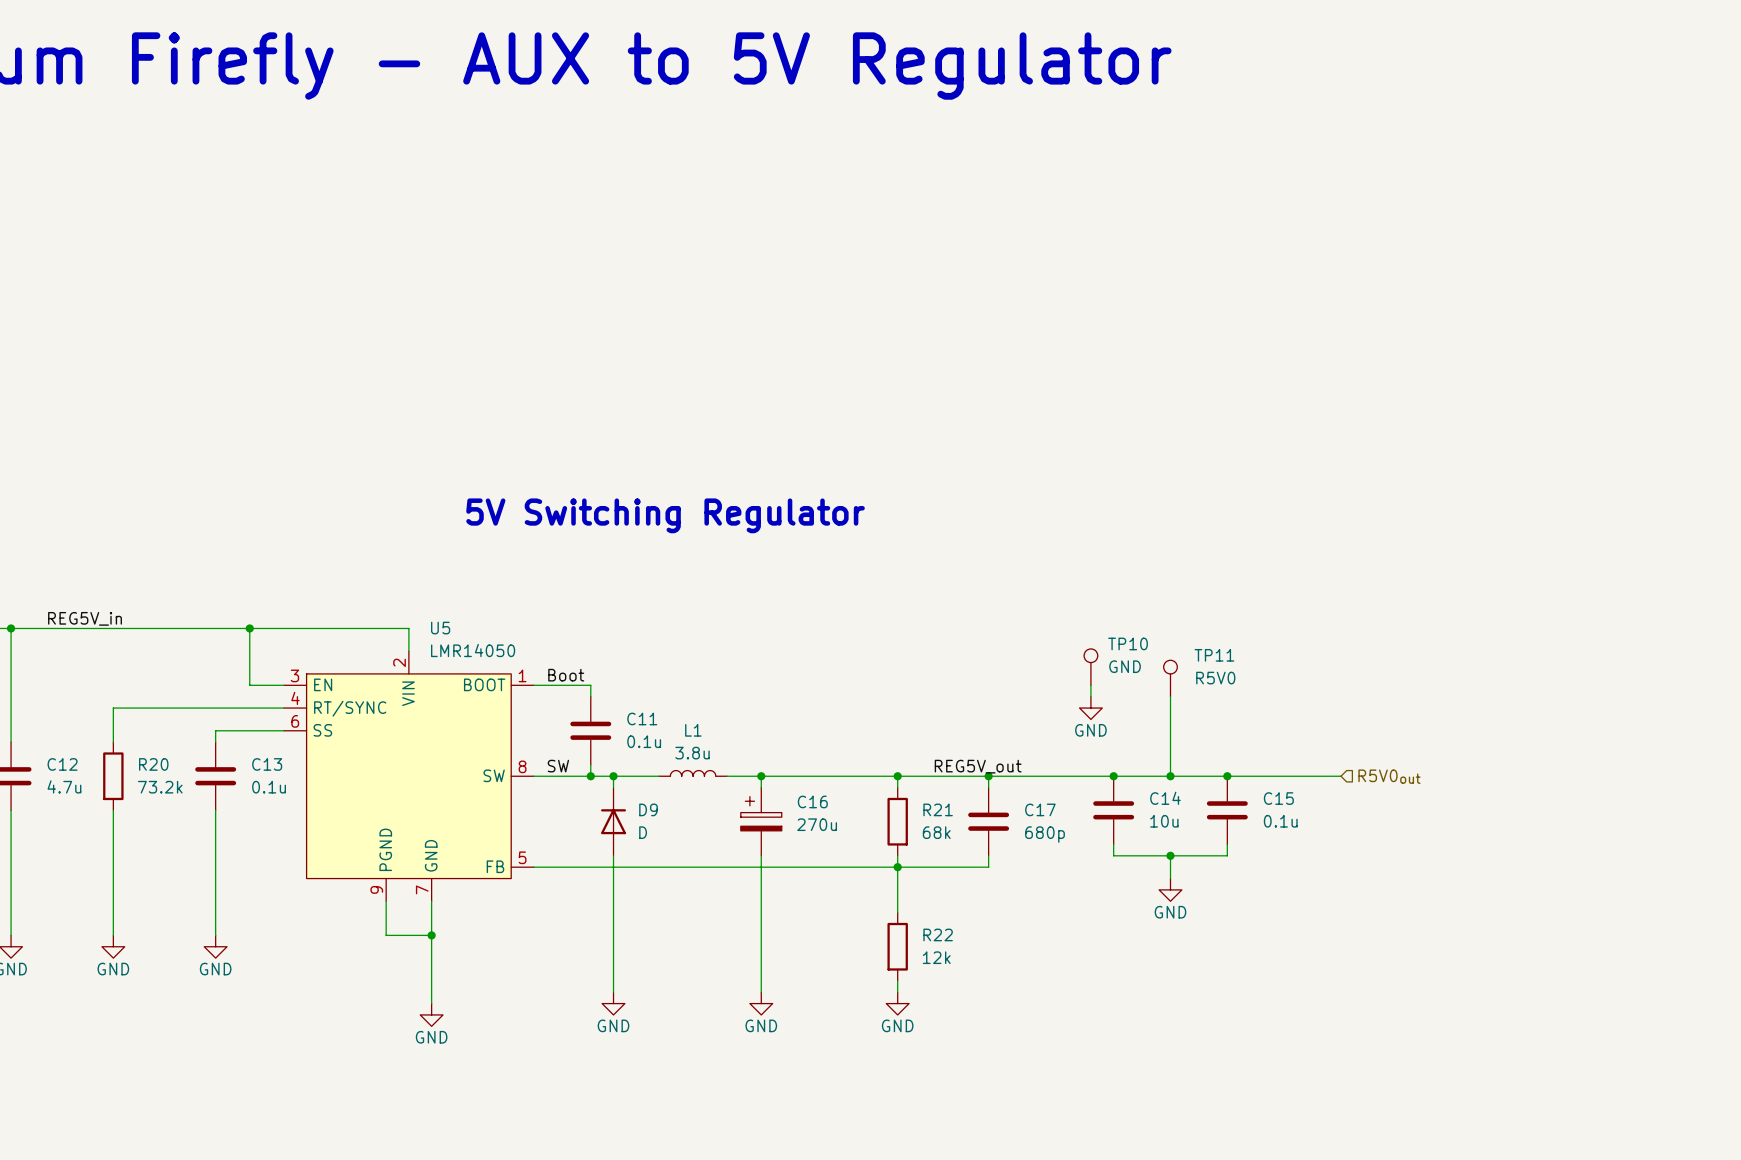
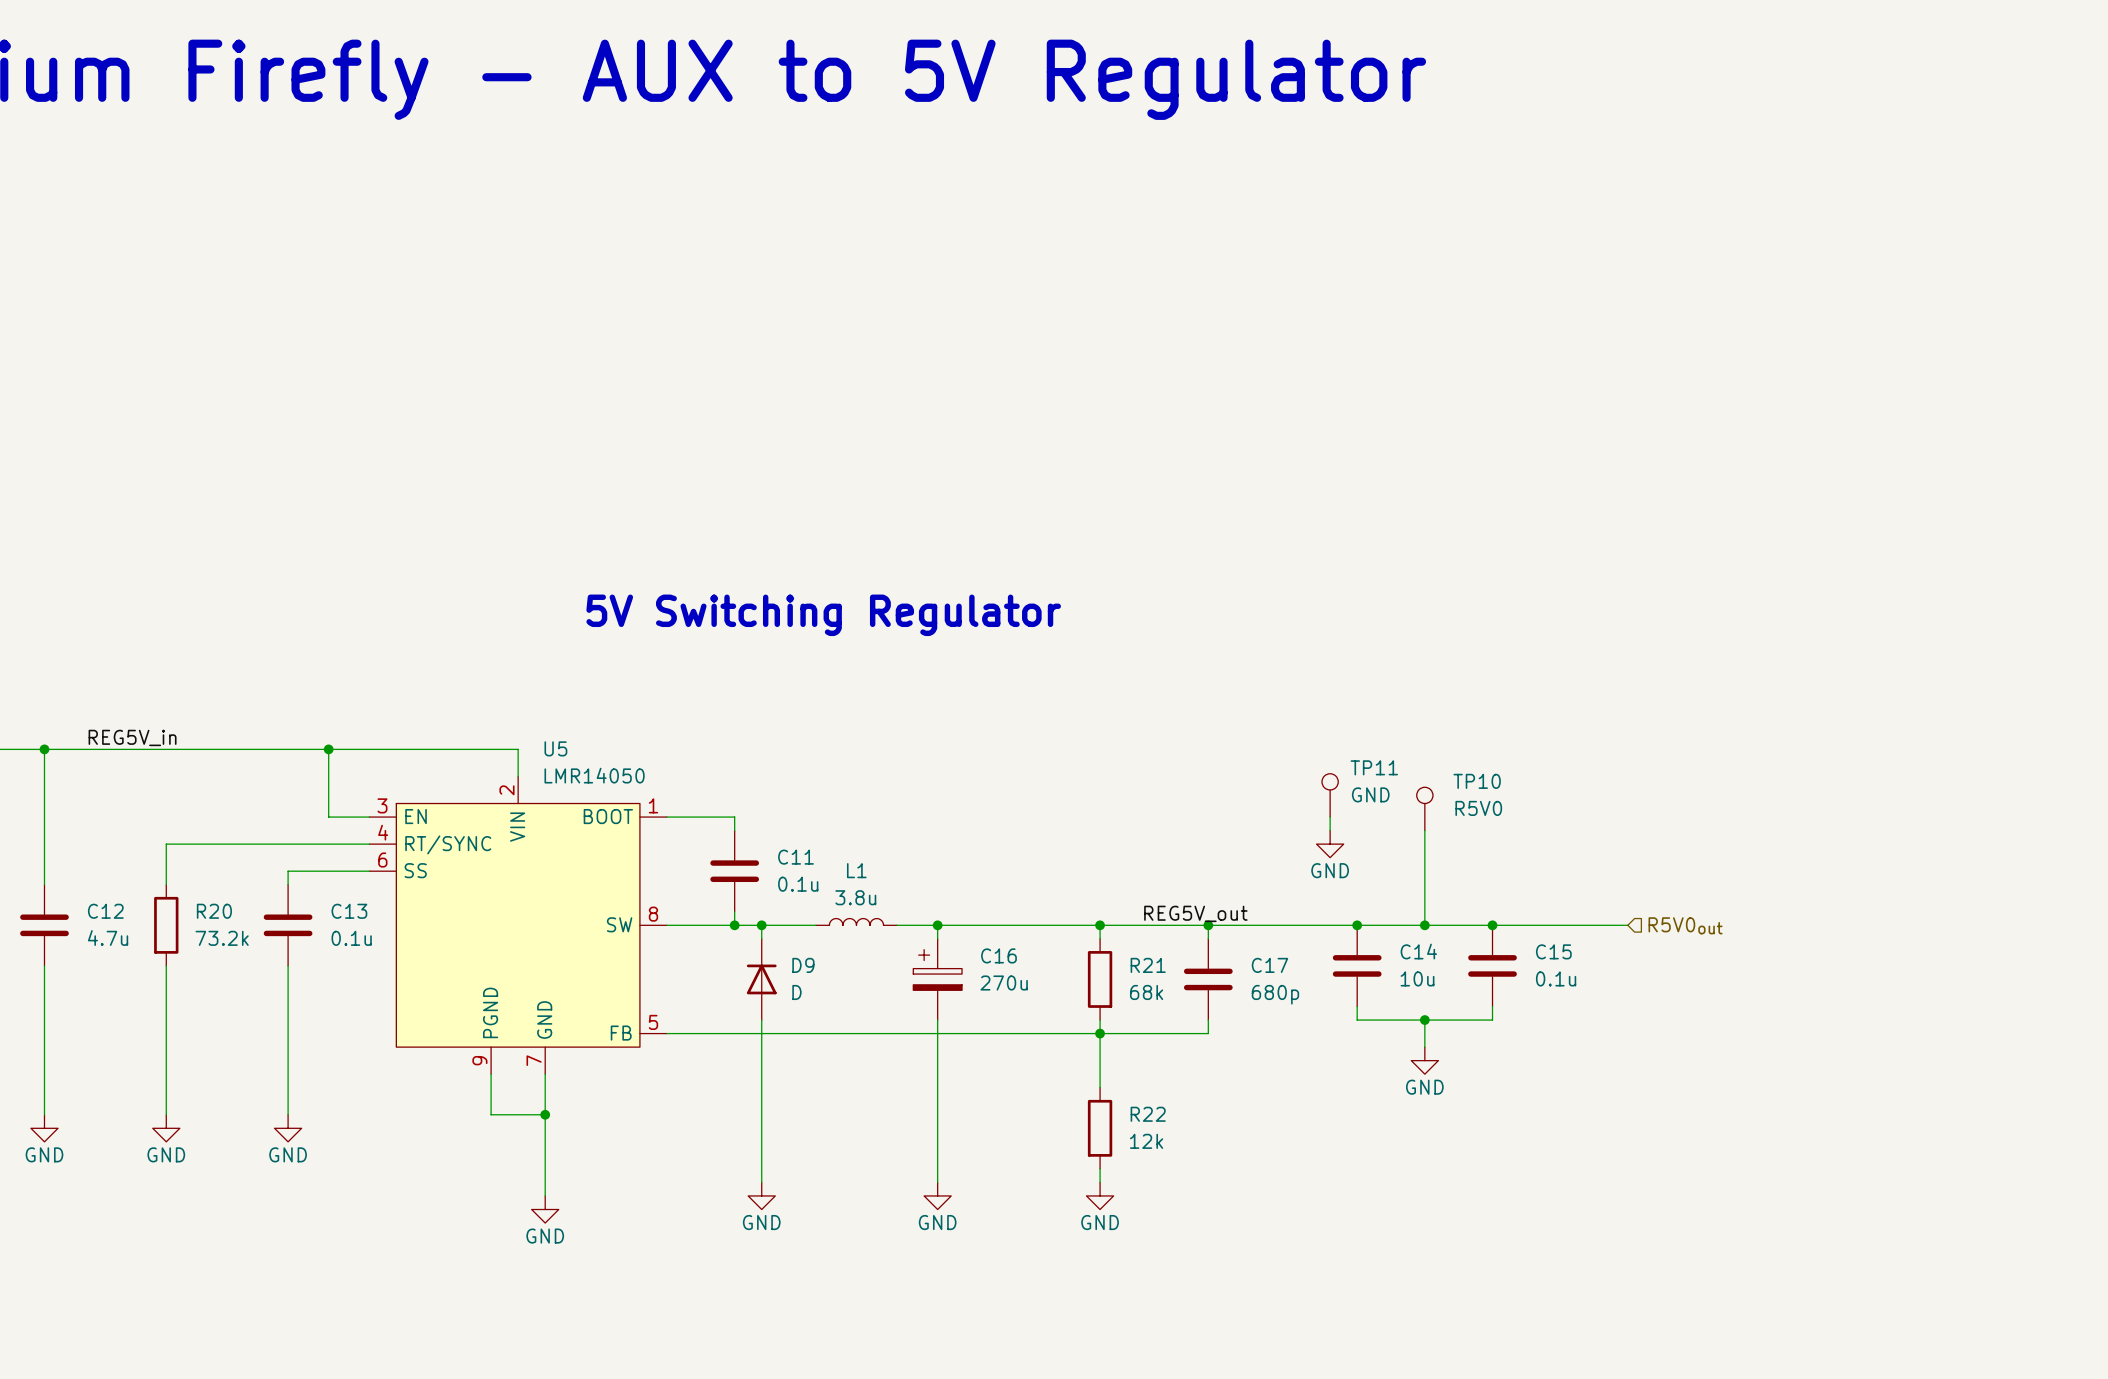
TP10 name: TP10 (1128, 643) -> TP11 (1374, 767)
TP11 name: TP11 (1214, 655) -> TP10 (1477, 781)
label: Boot (566, 675) -> none
label: SW (558, 766) -> none

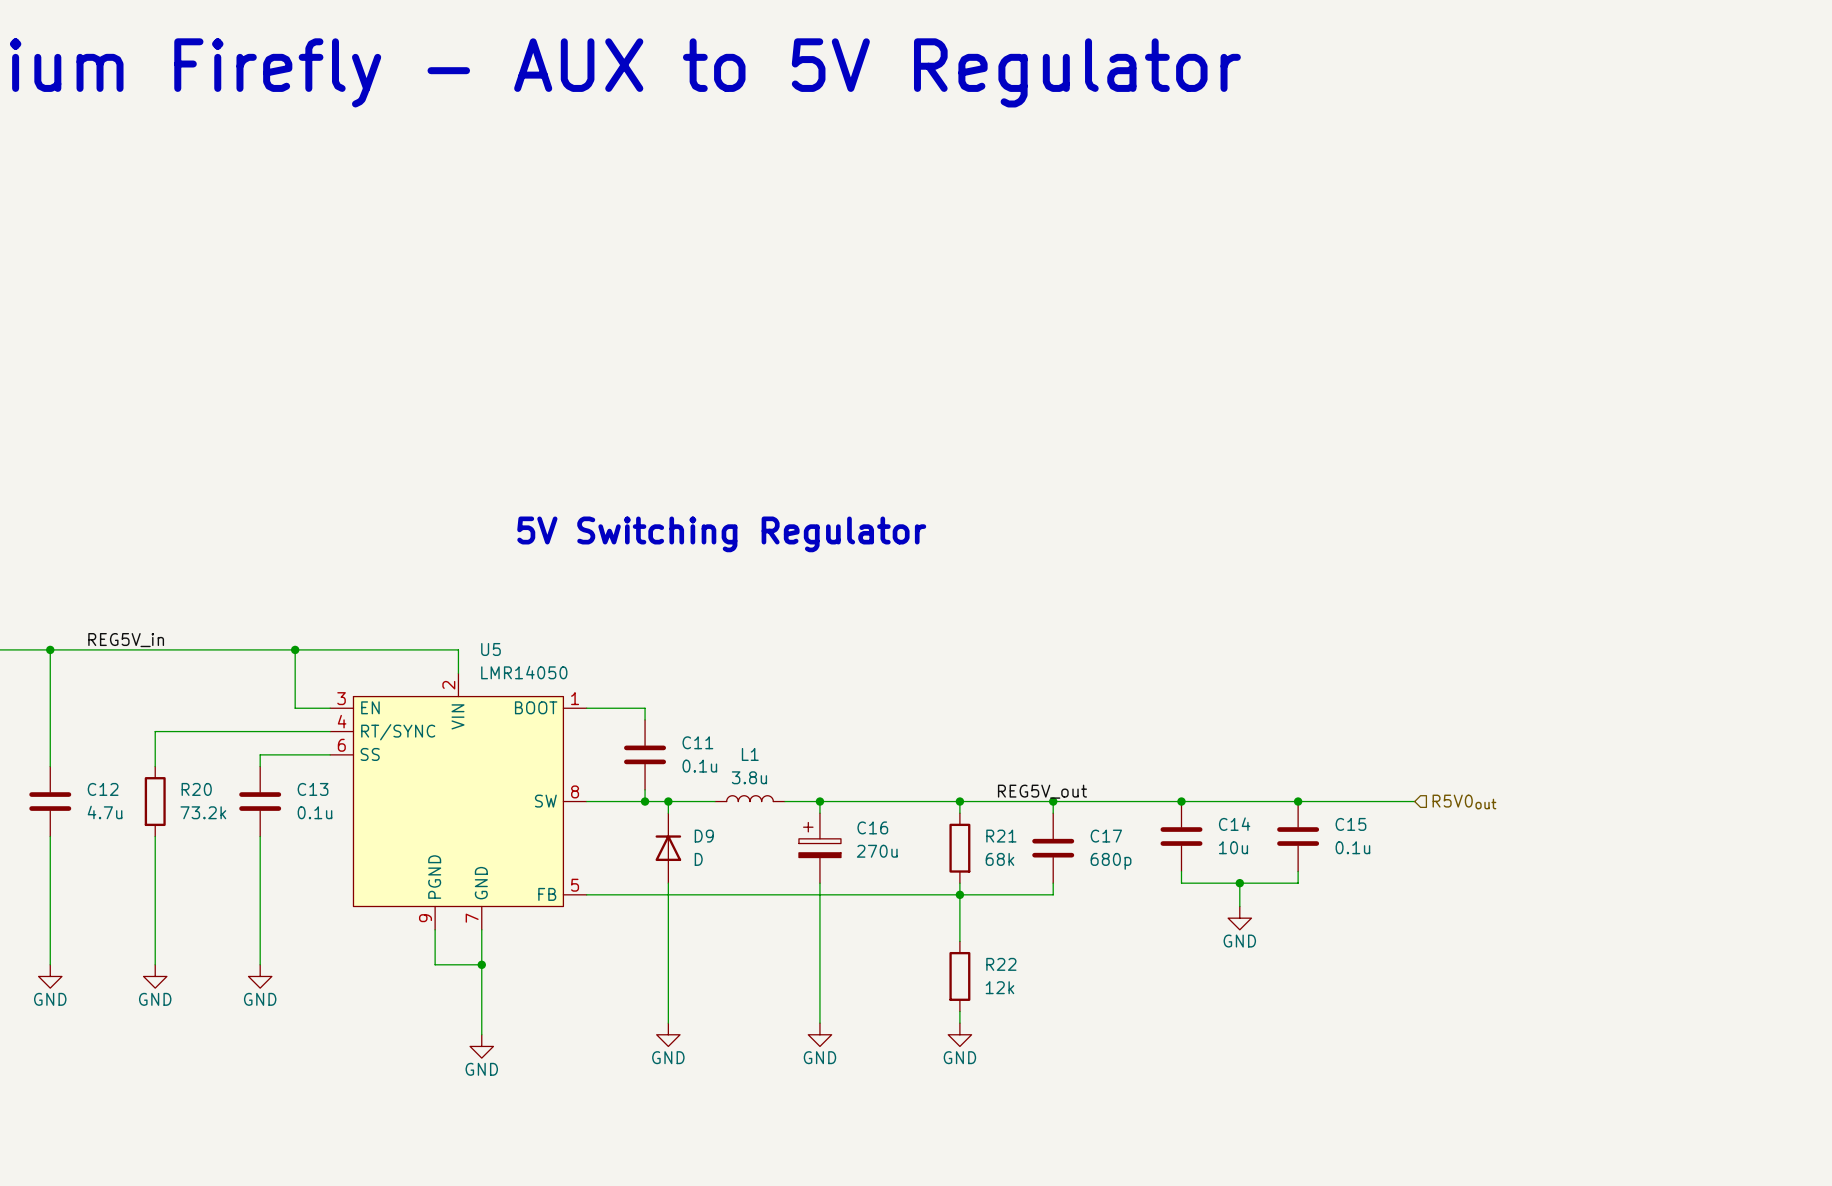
TP11: GND (1330, 795) -> none
TP10: R5V0 (1424, 808) -> none
wire: (1330, 817) (1330, 830) -> none
wire: (1424, 830) (1424, 925) -> none
power symbol: GND (1330, 844) -> none
junction: (1424, 925) -> none

